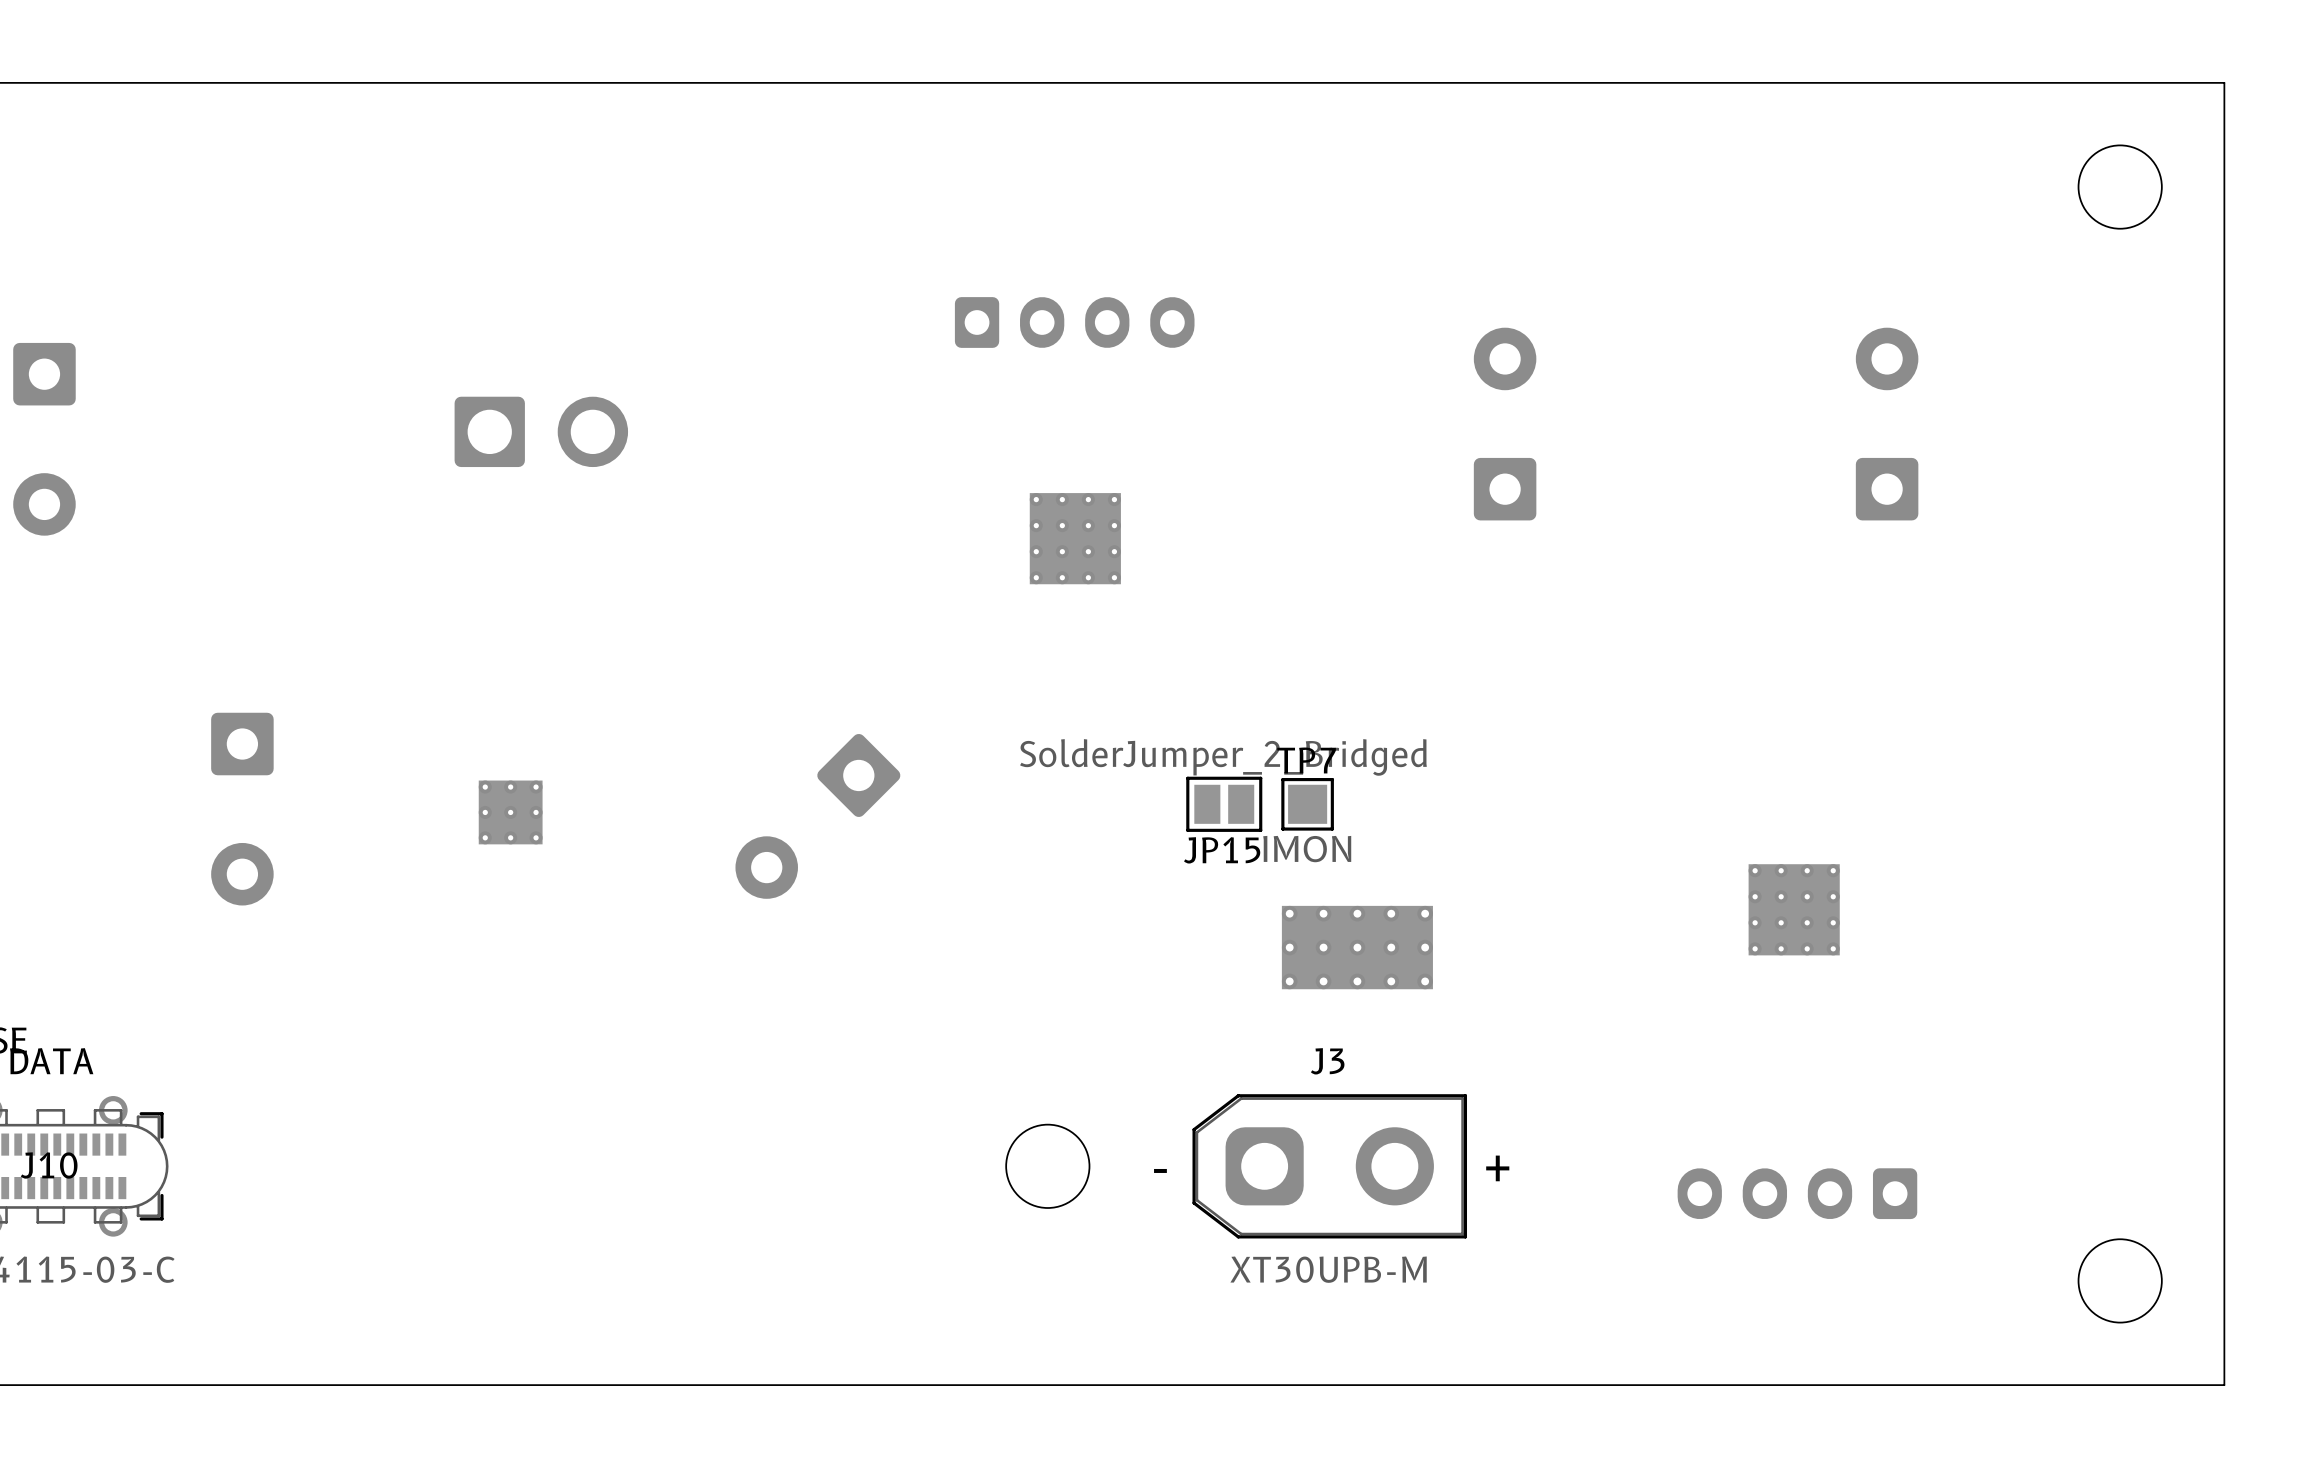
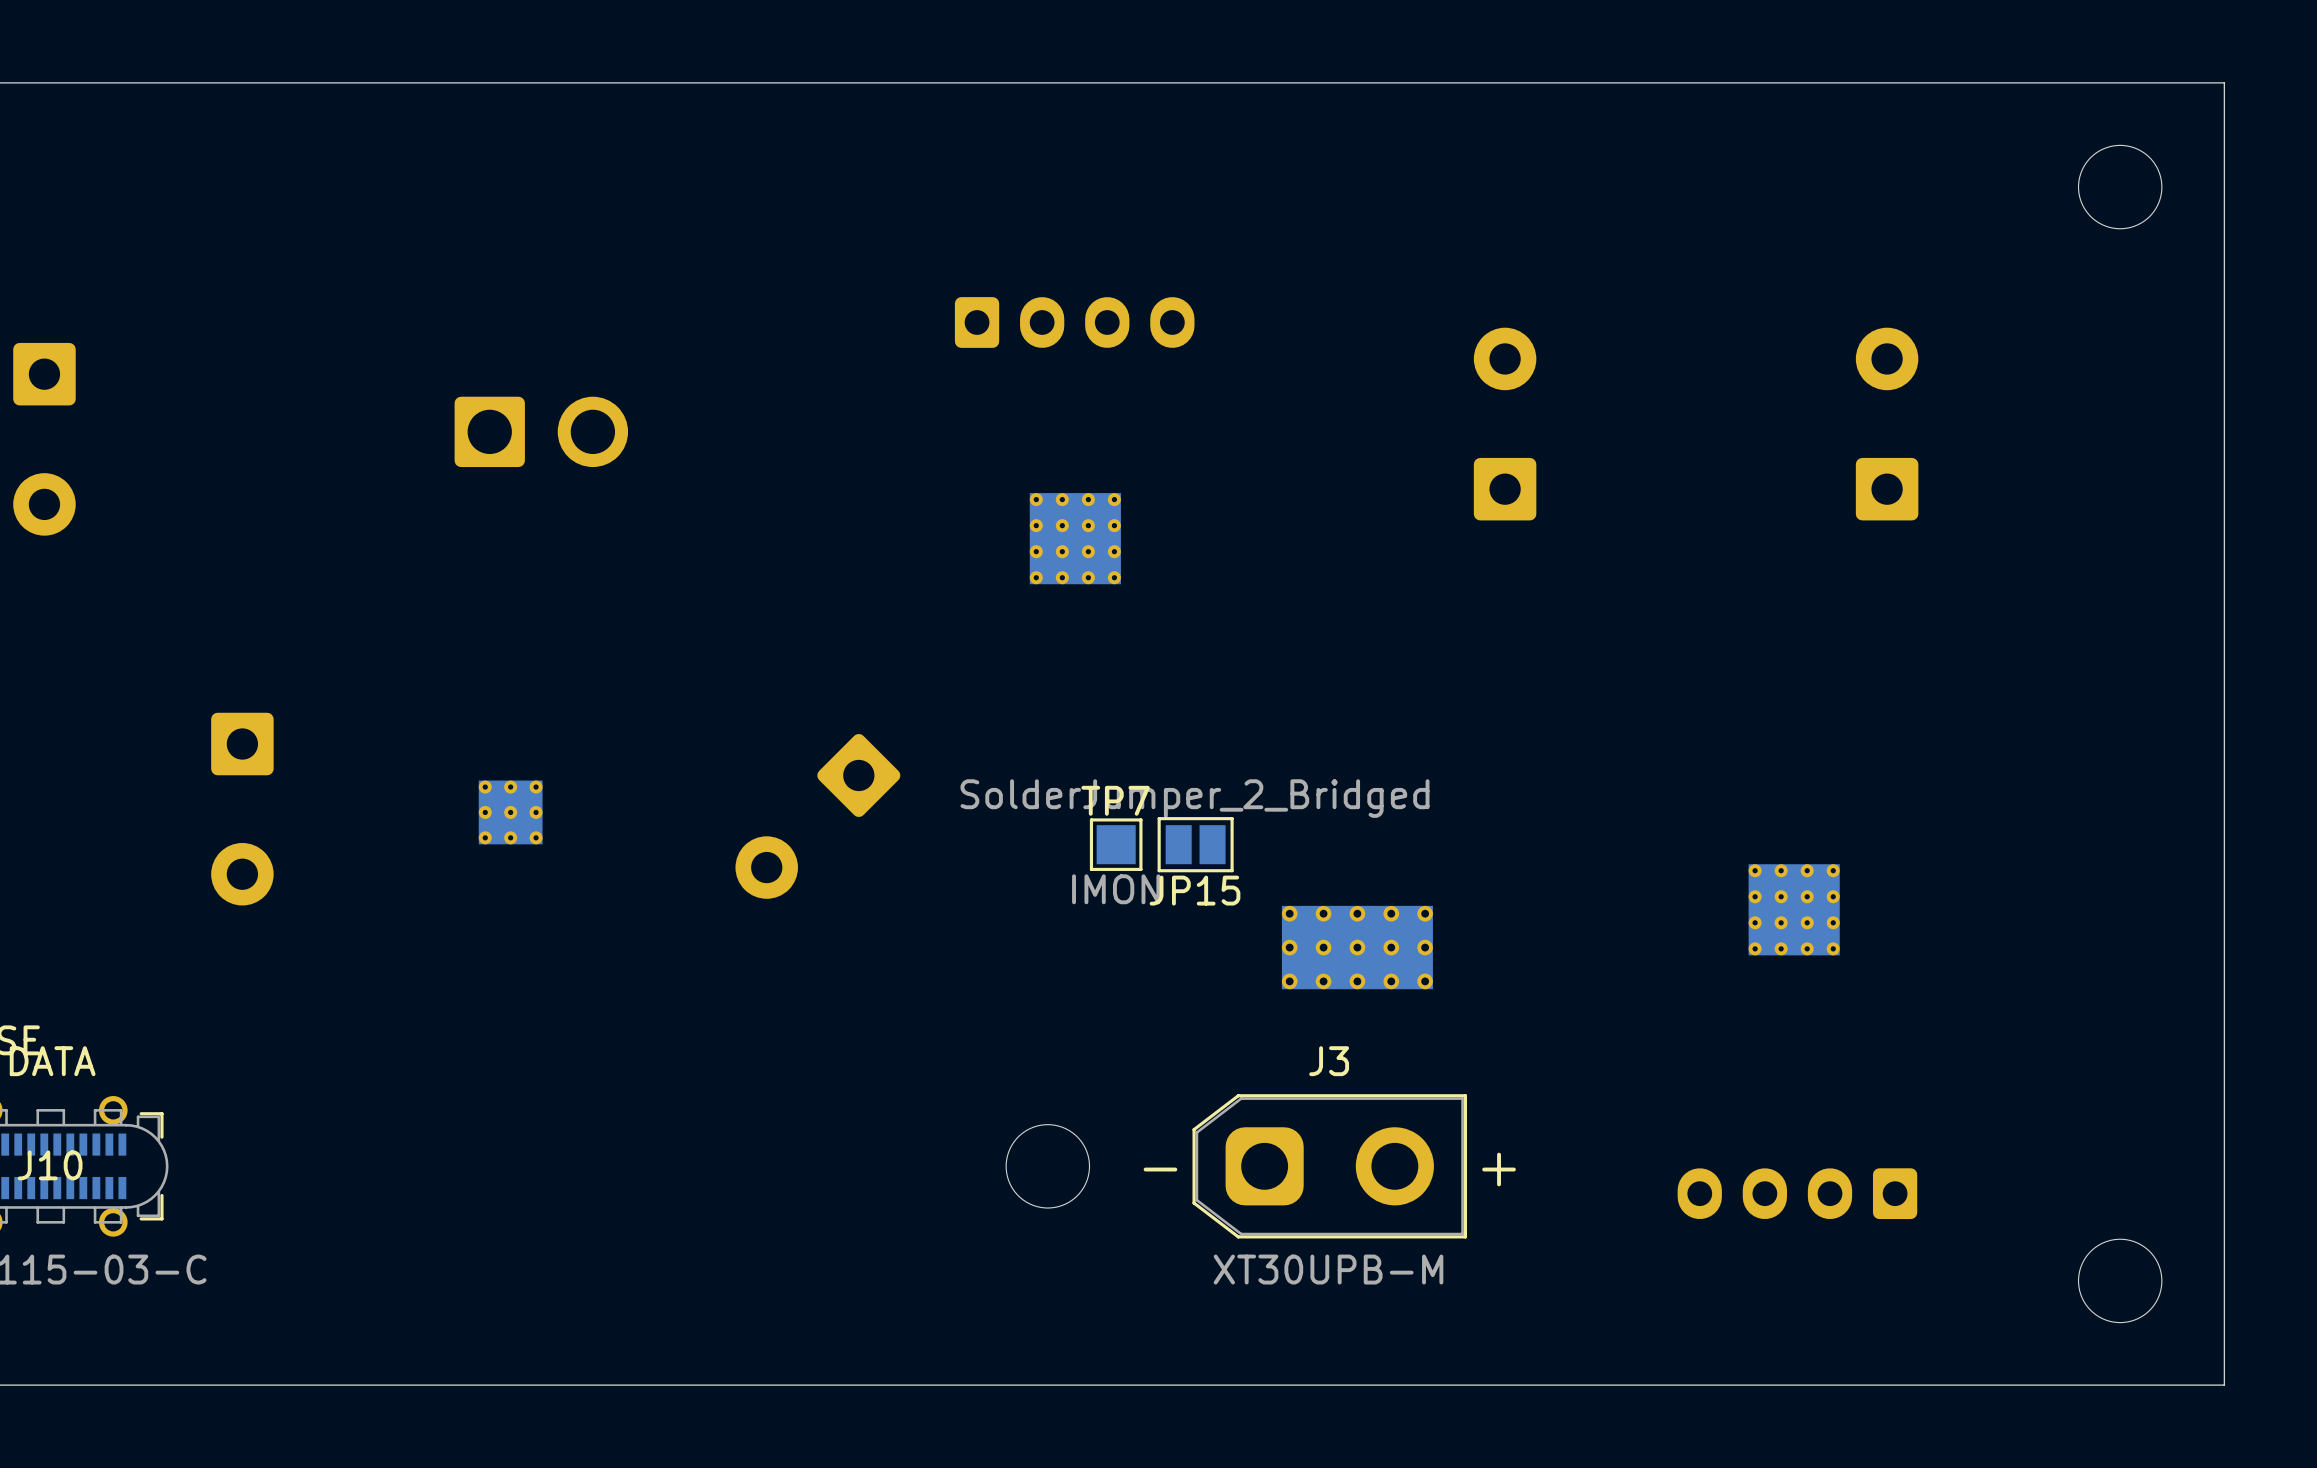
JP15 position: (1224, 804) -> (1195, 844)
TP7 position: (1307, 804) -> (1116, 844)

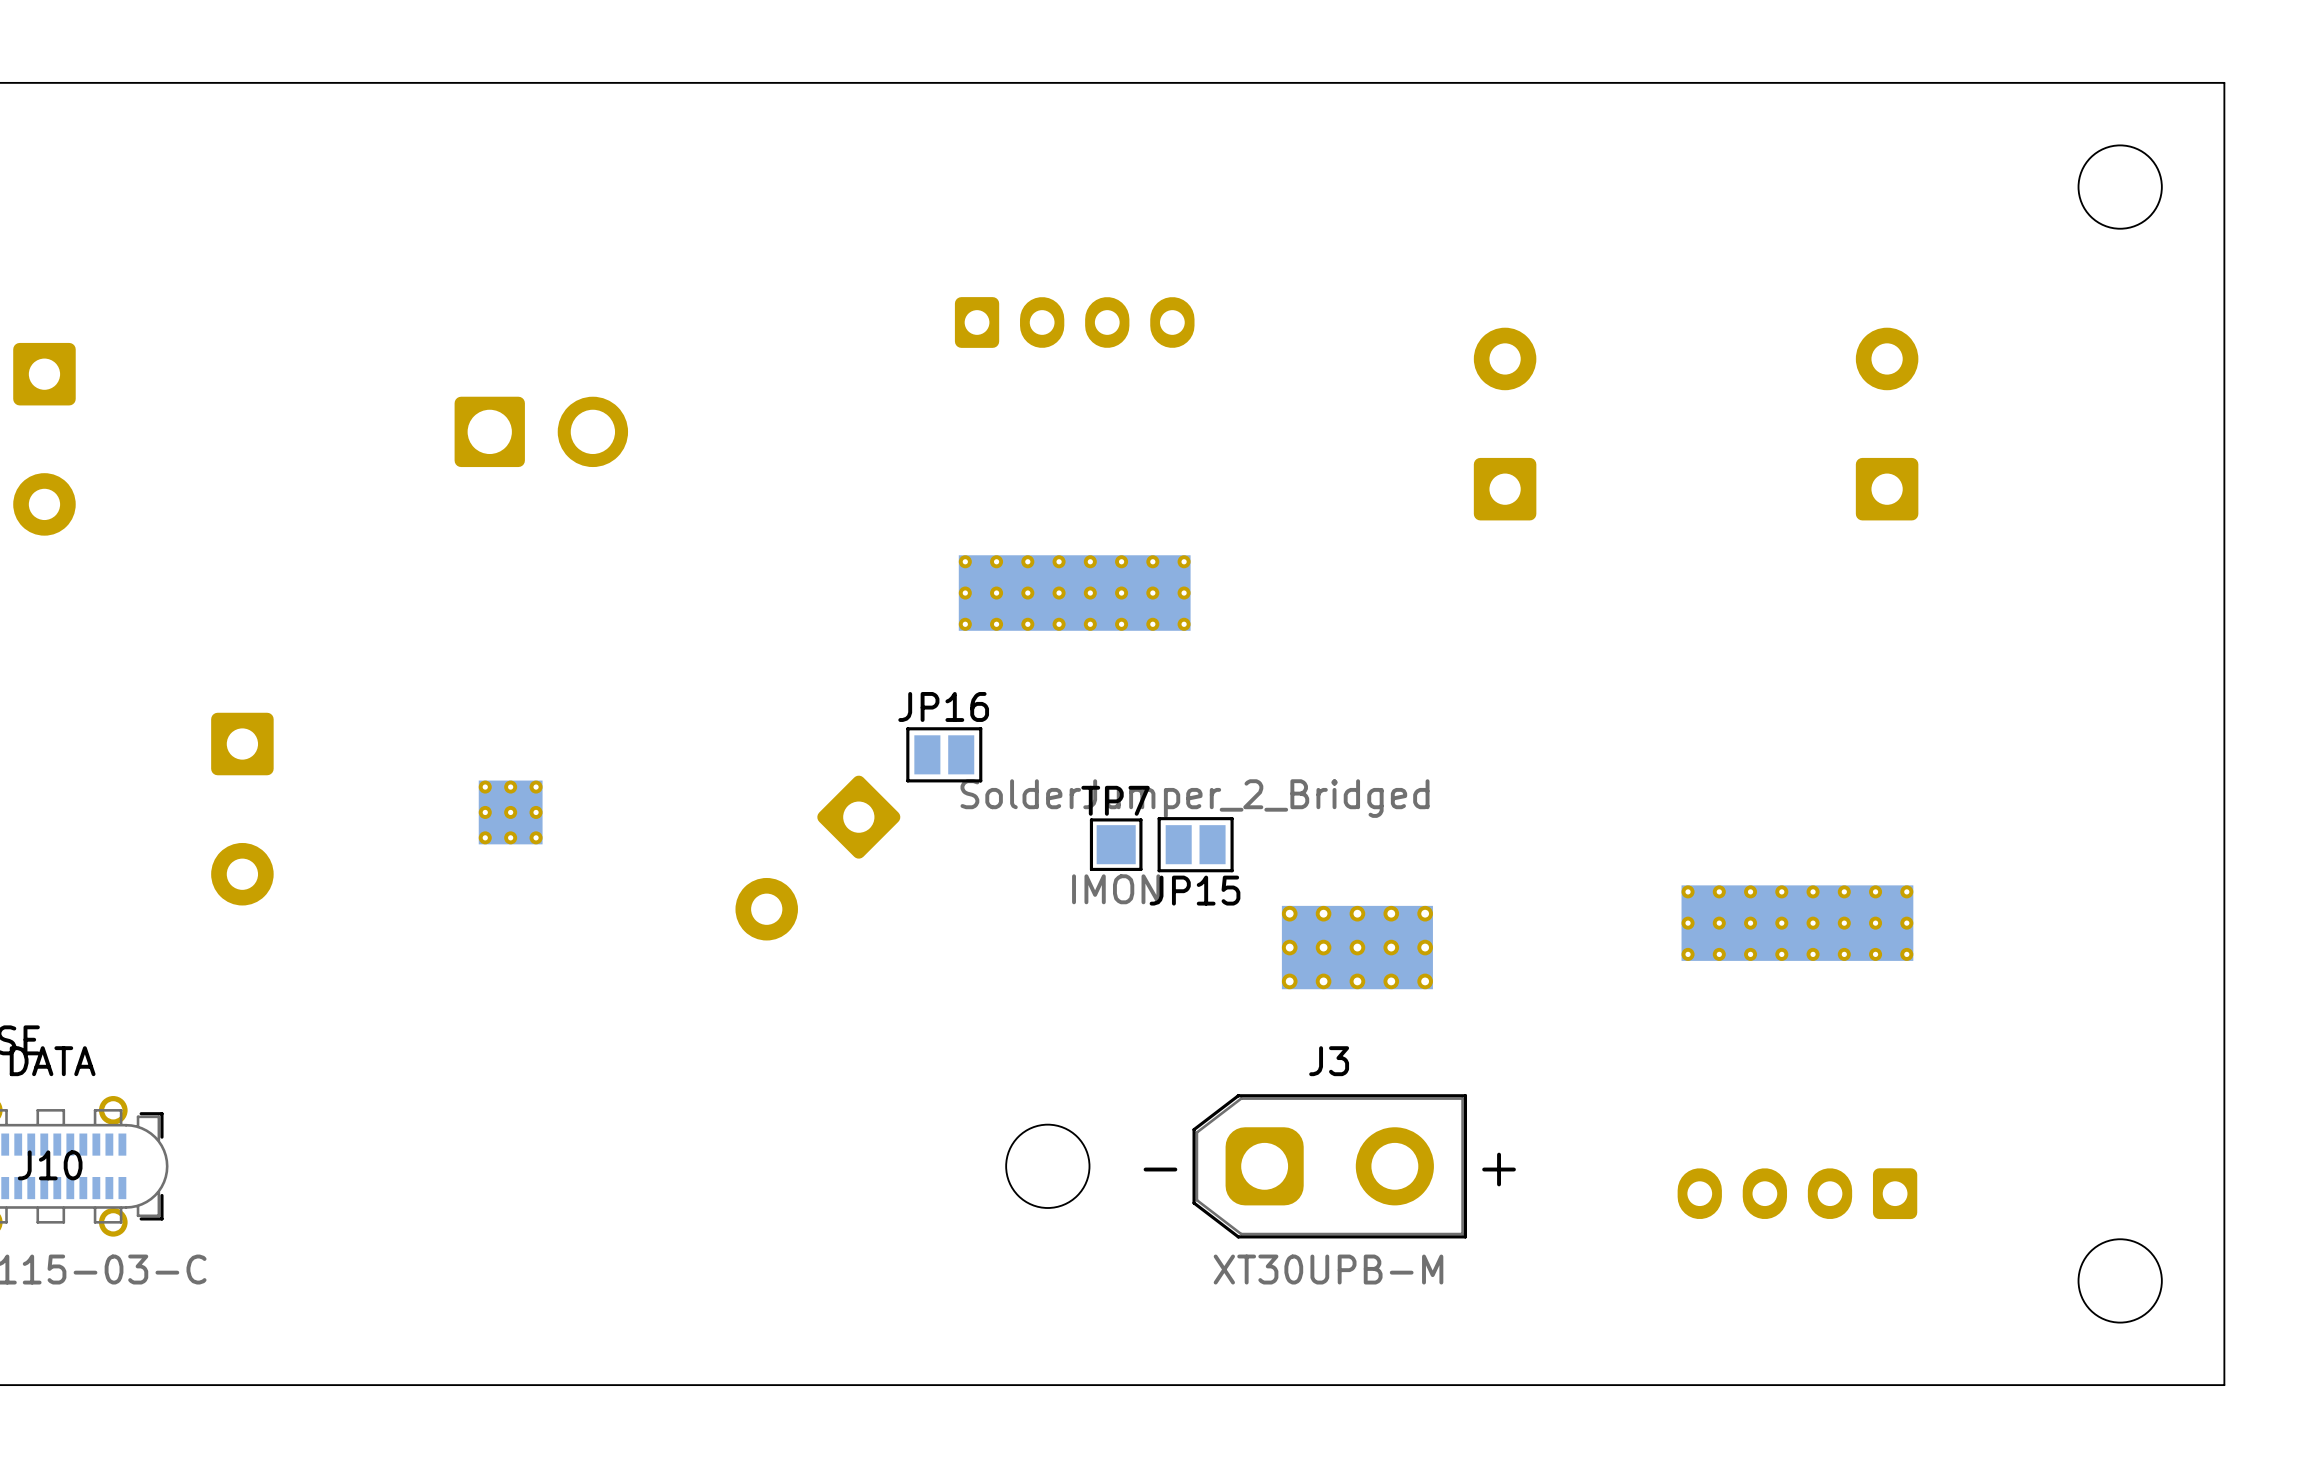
part: (1075, 538) -> none
part: none -> (1074, 593)
JP16: none -> (944, 754)
part position: (817, 816) -> (817, 858)
part footprint: [1748, 864, 1840, 956] -> [1681, 885, 1914, 961]

